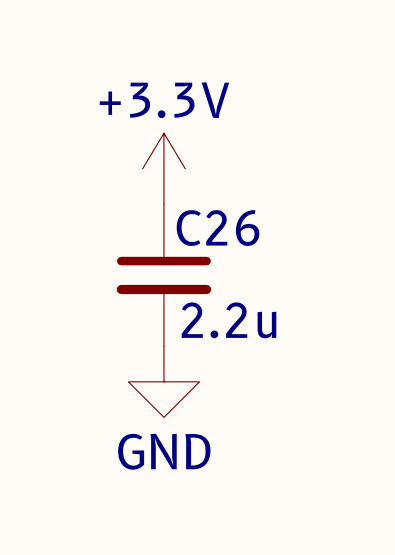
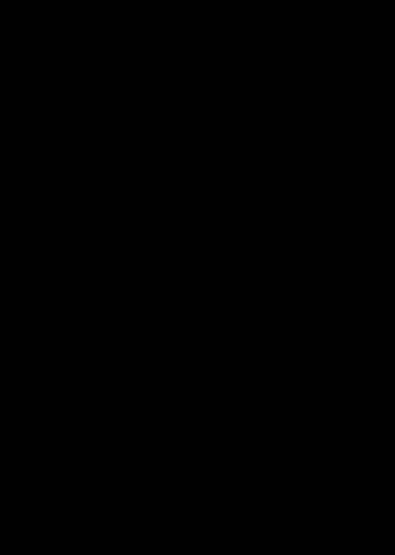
power symbol: +3.3V (163, 168) -> none
C26: 2.2u (163, 275) -> none
power symbol: GND (163, 381) -> none

